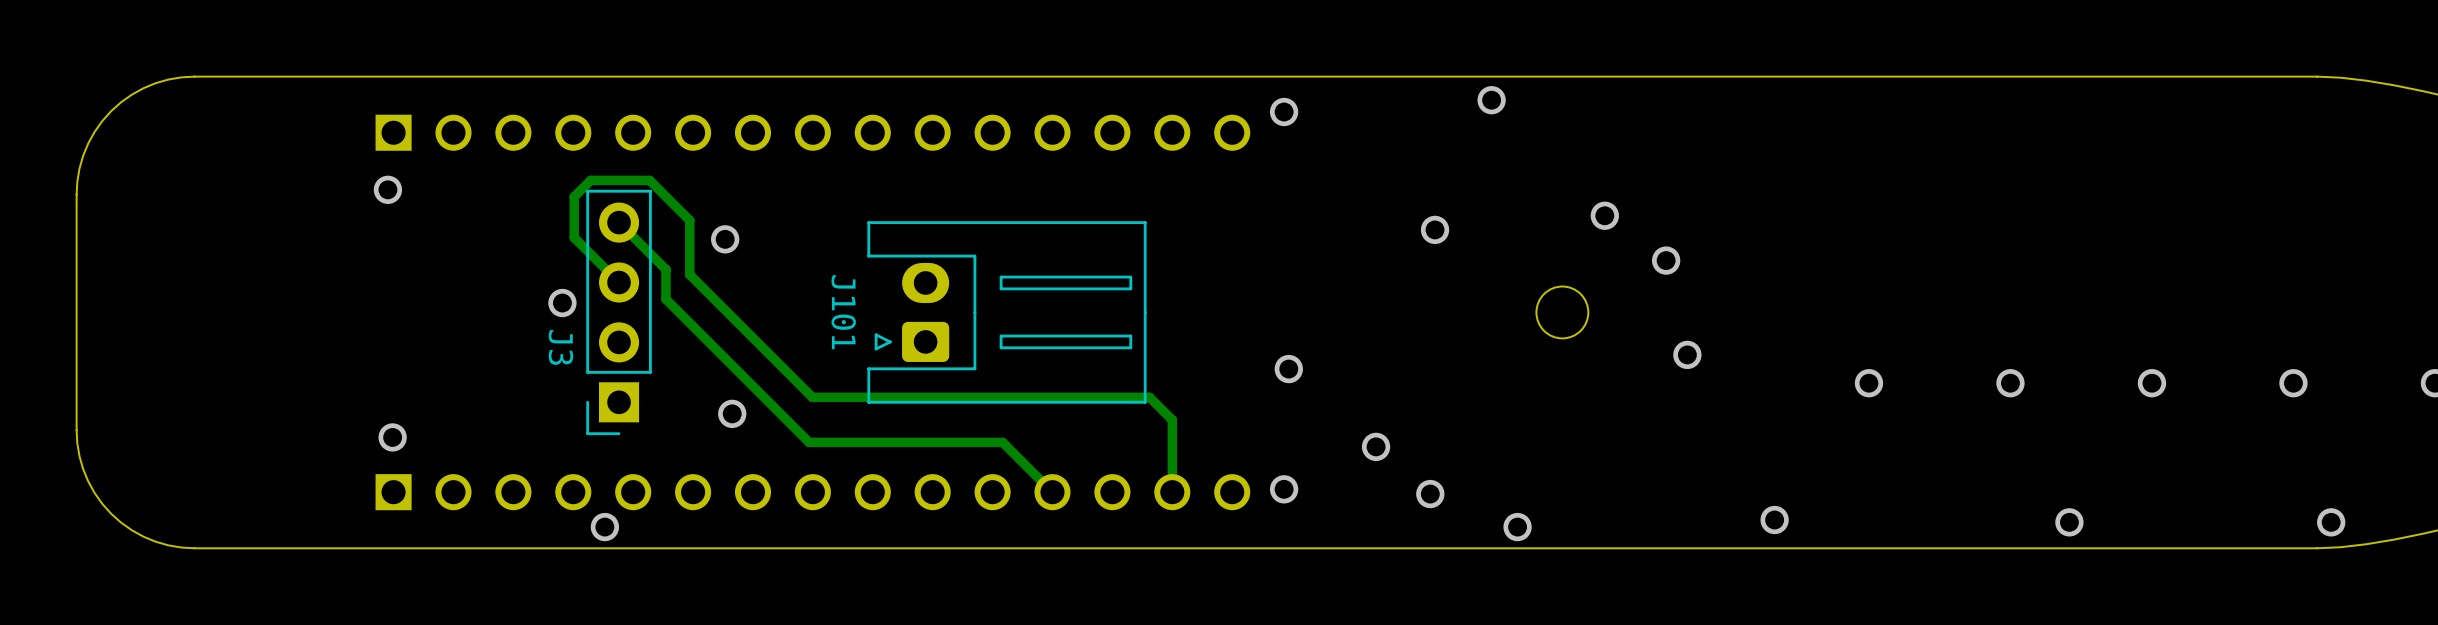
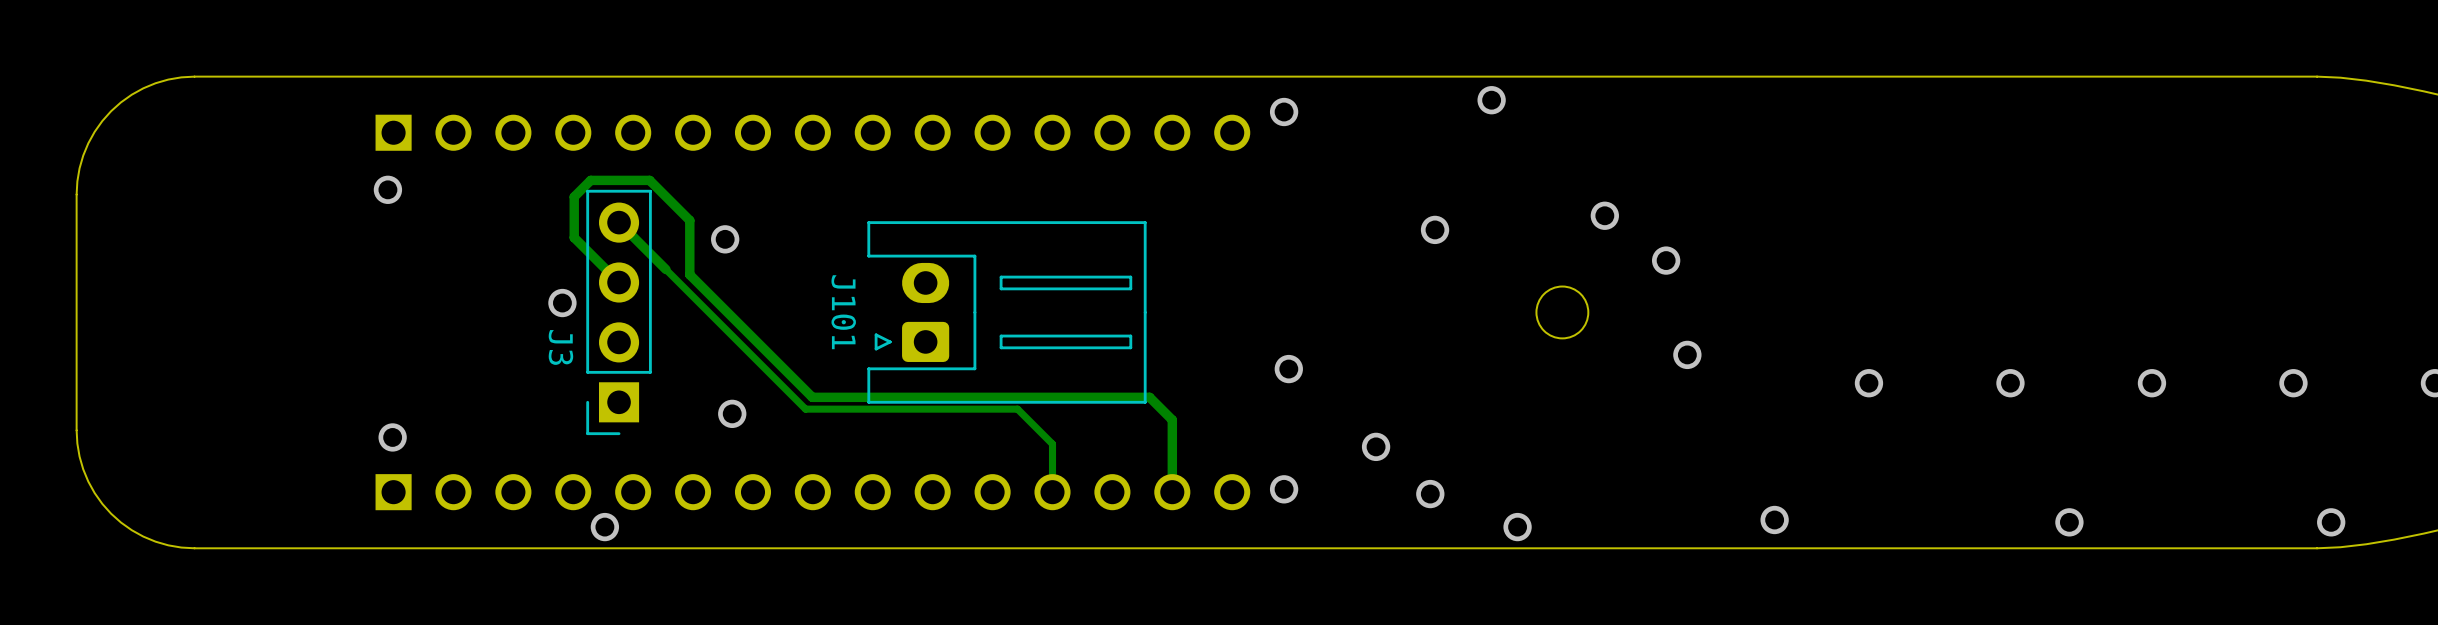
track: (665, 269) (665, 299) (809, 442) (1002, 442) (1052, 492) -> (665, 269) (805, 409) (1017, 409) (1052, 444) (1052, 492)

